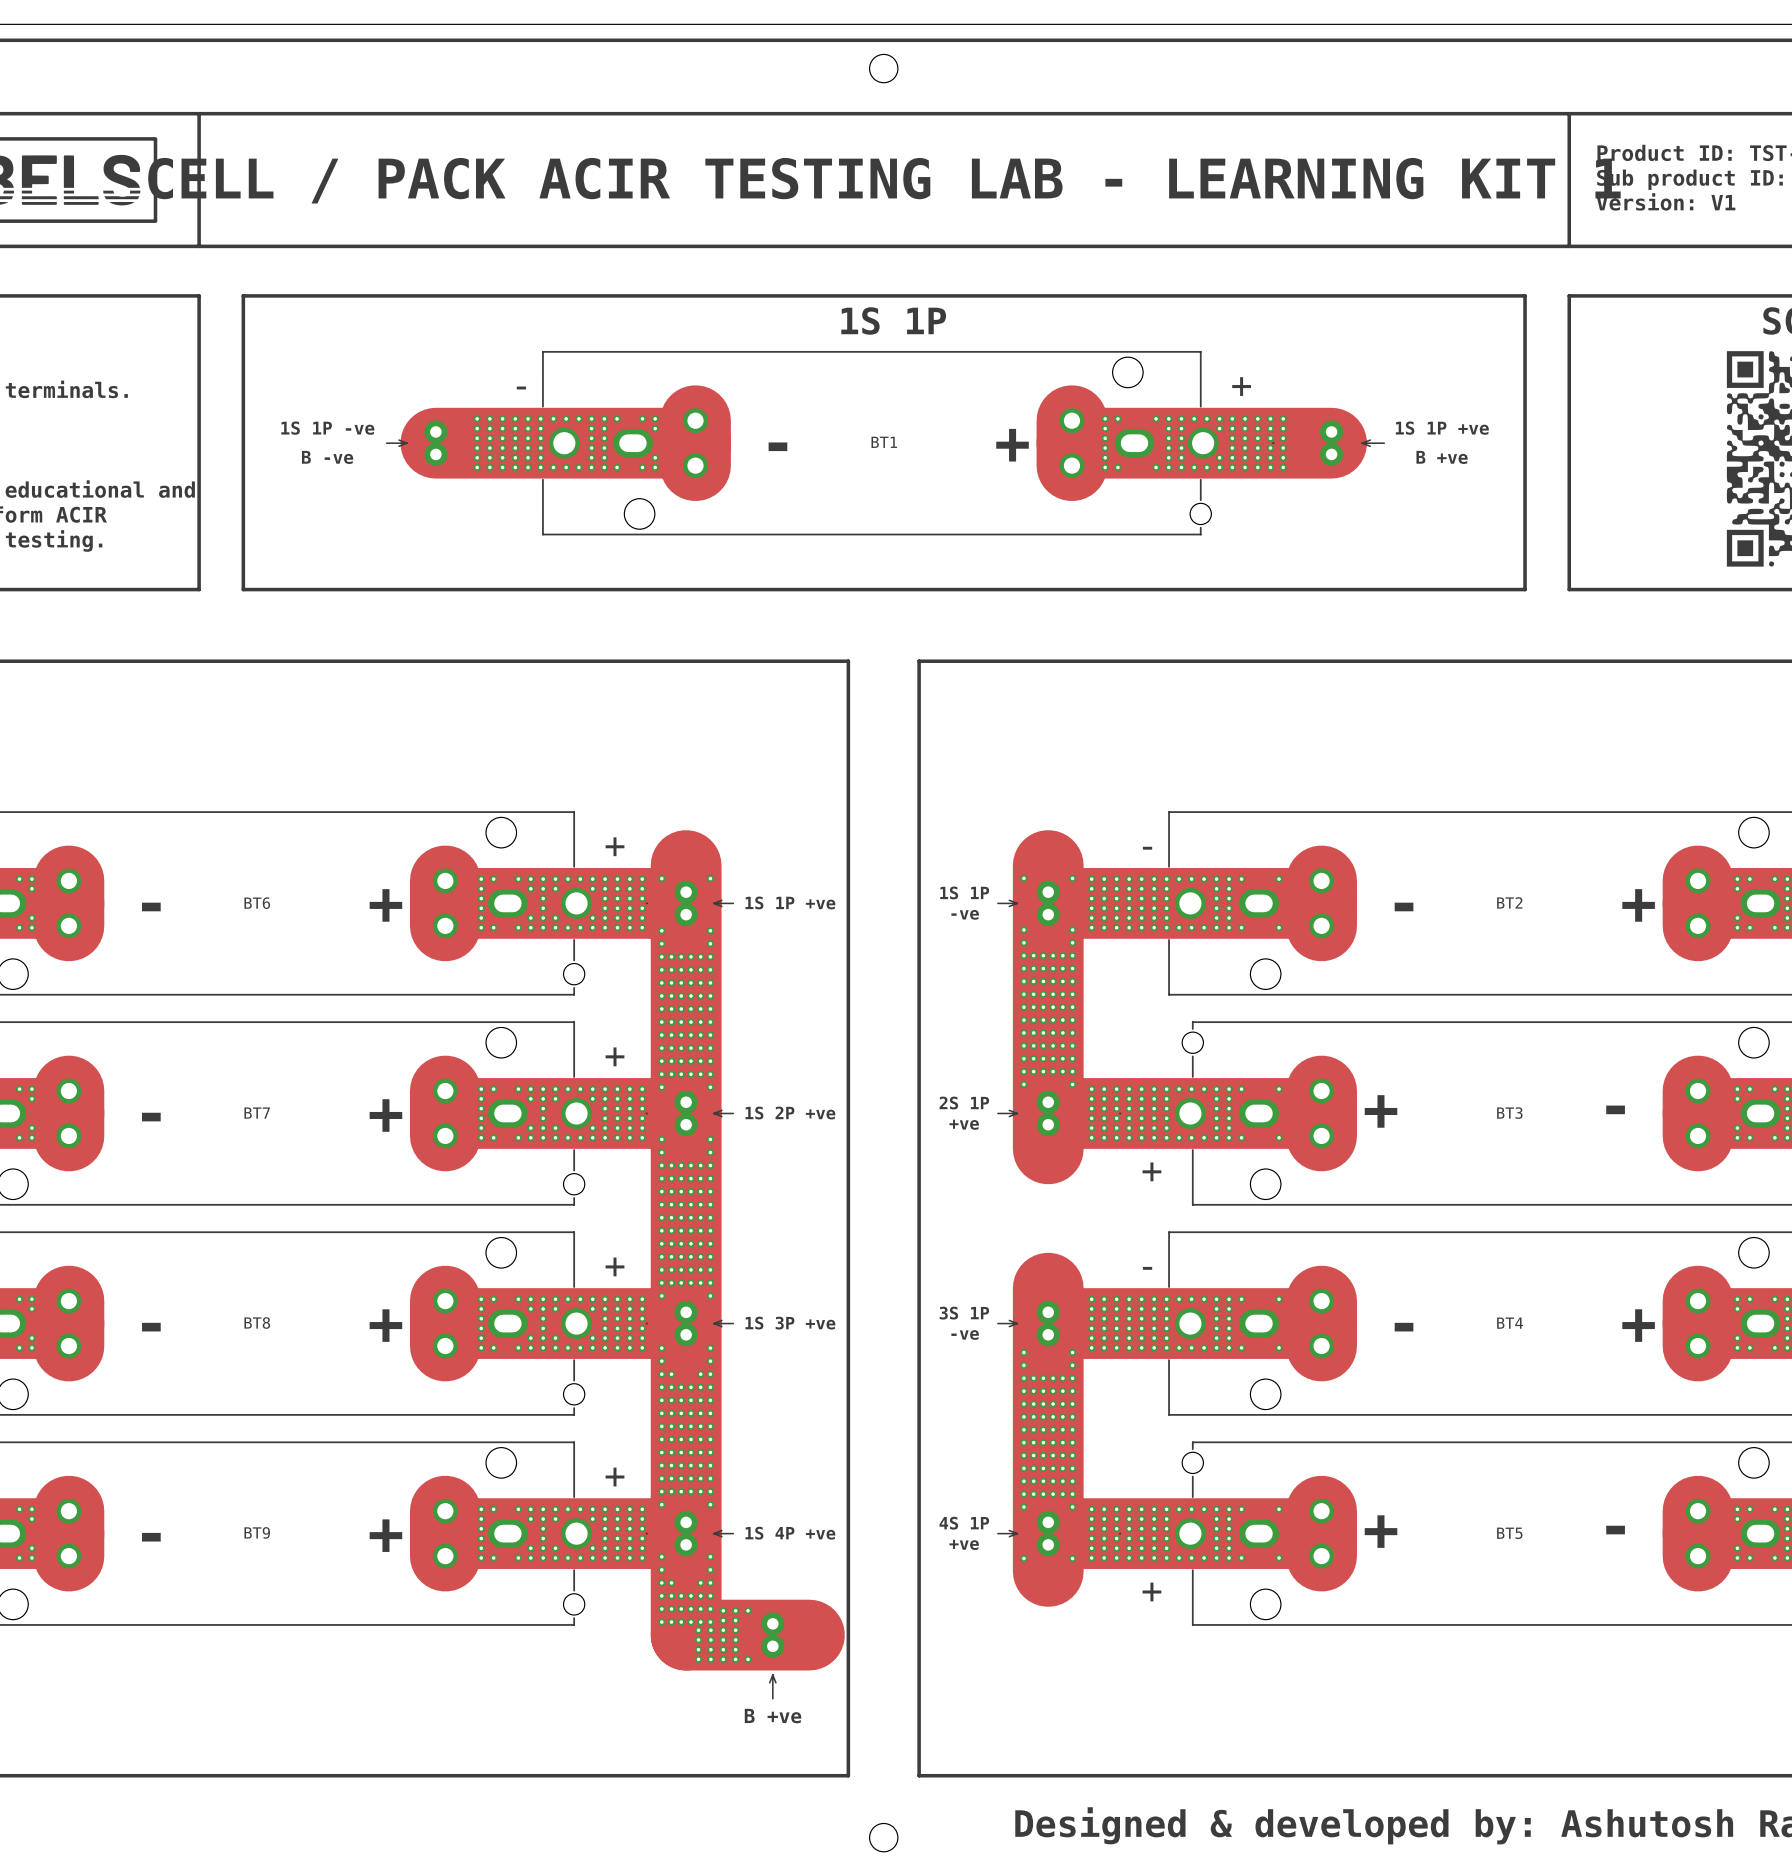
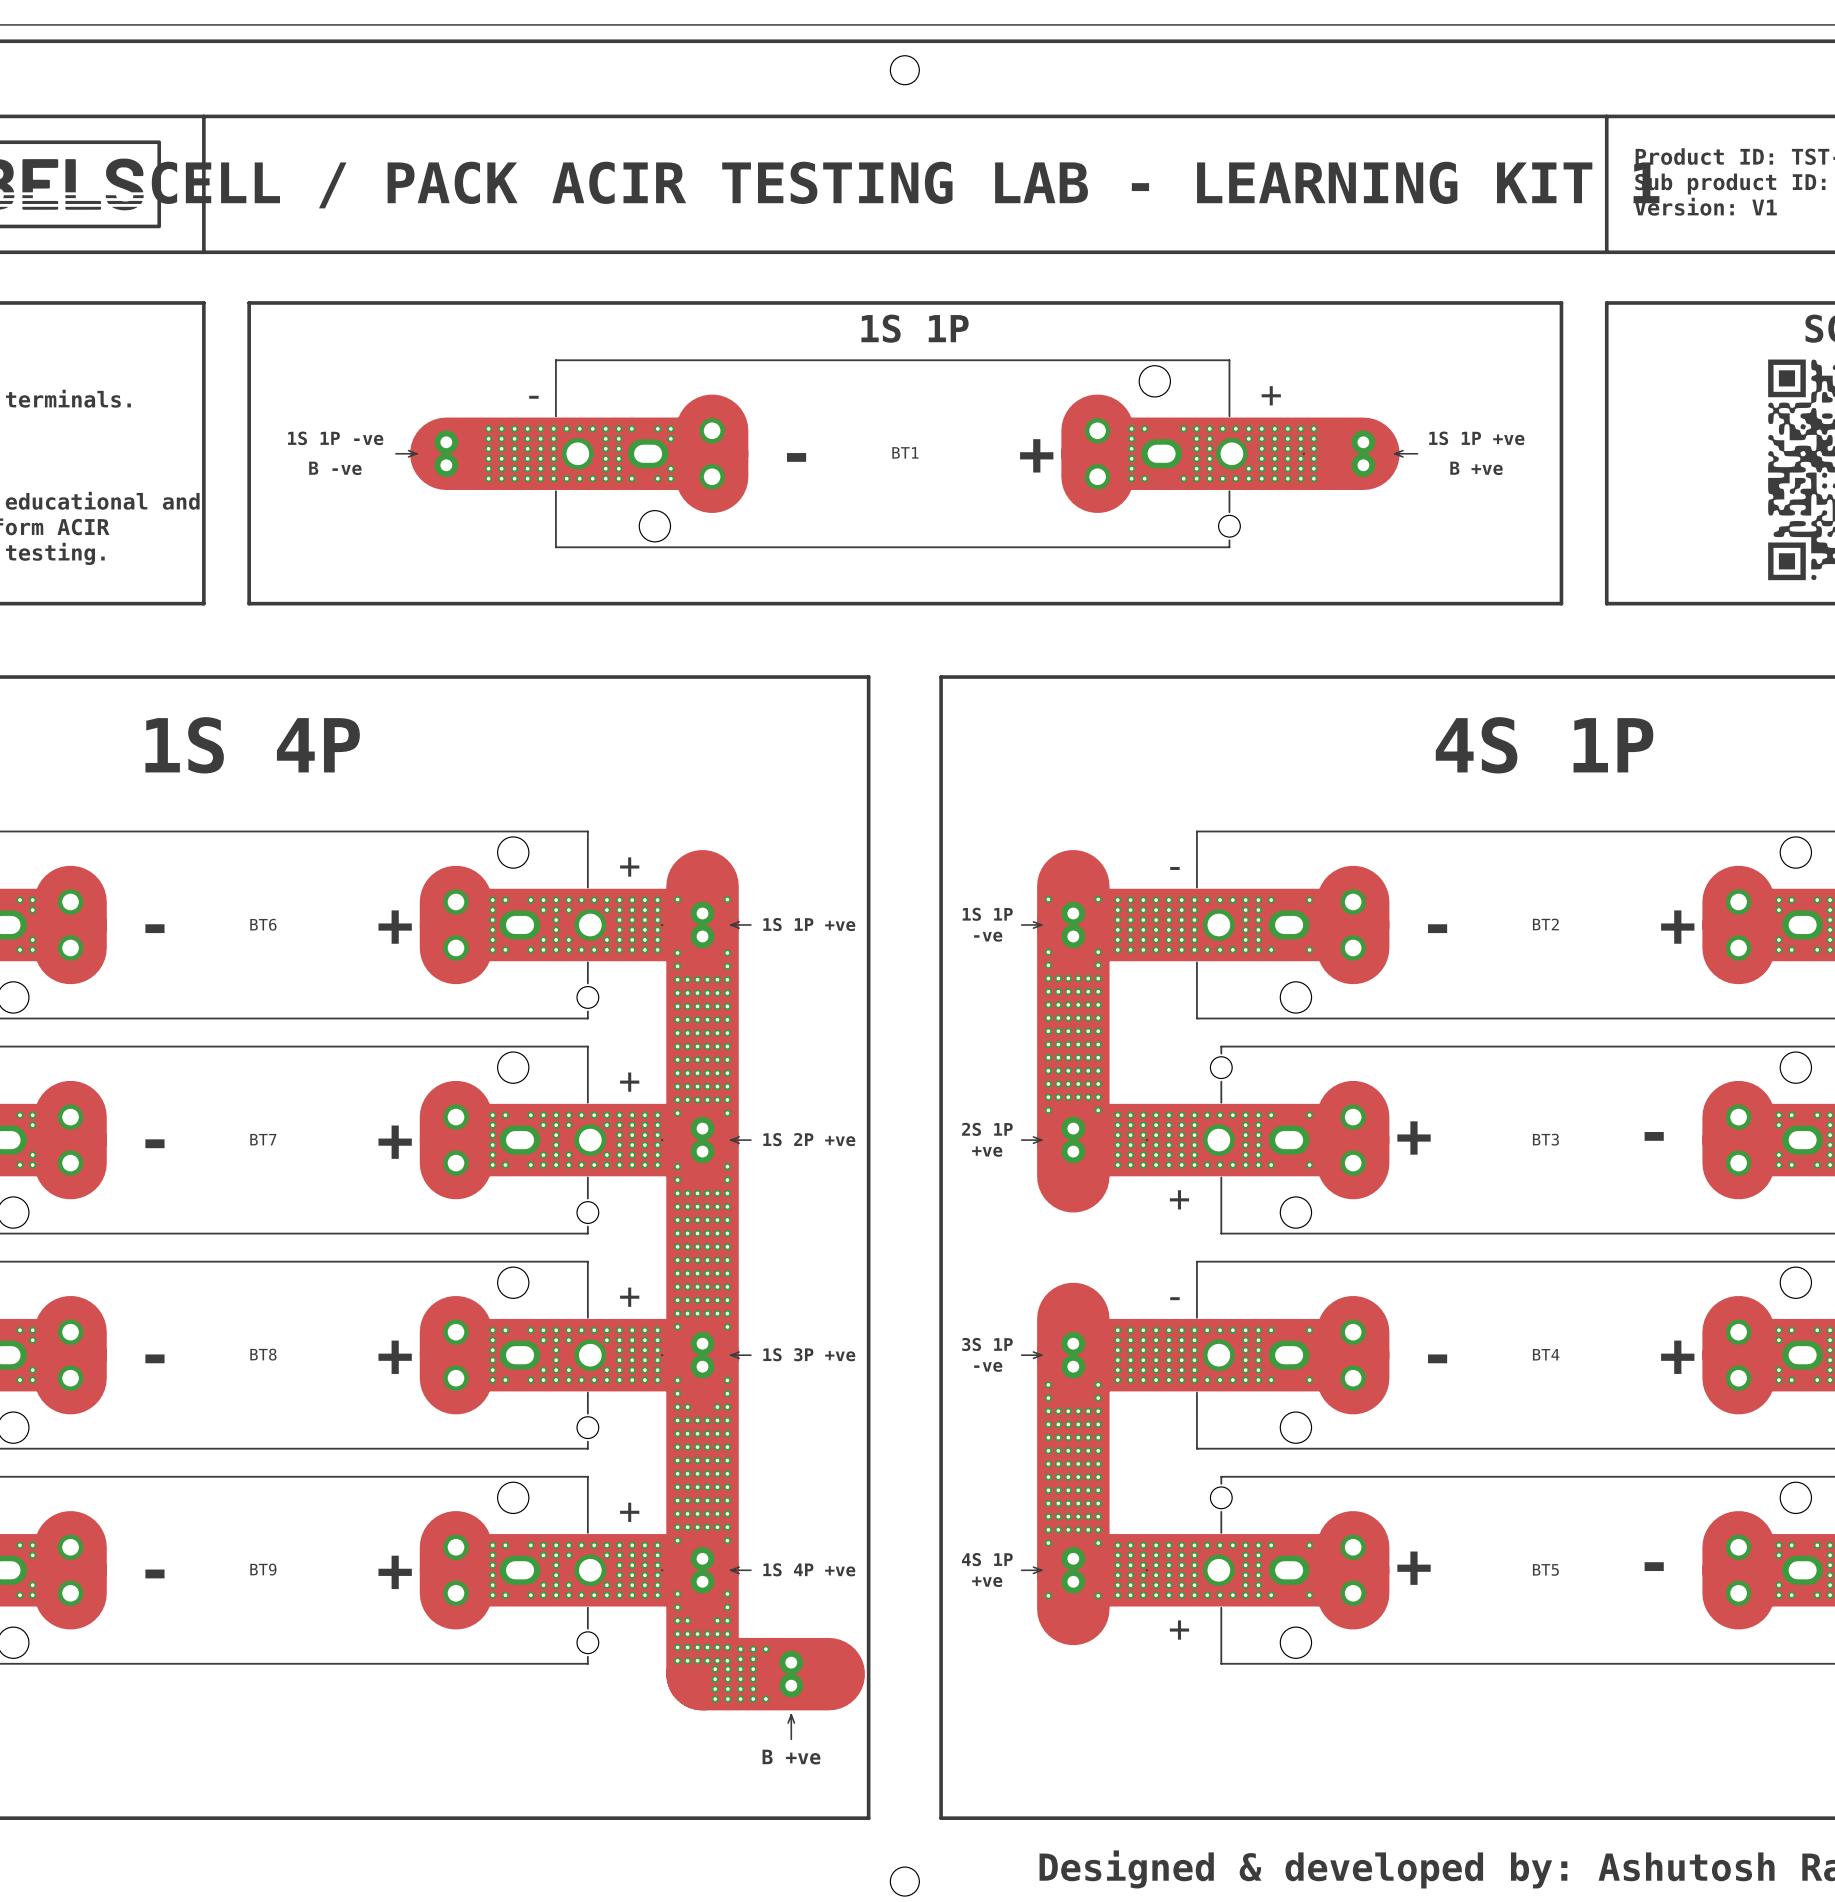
text: none -> 1S 4P (252, 745)
text: none -> 4S 1P (1544, 745)

